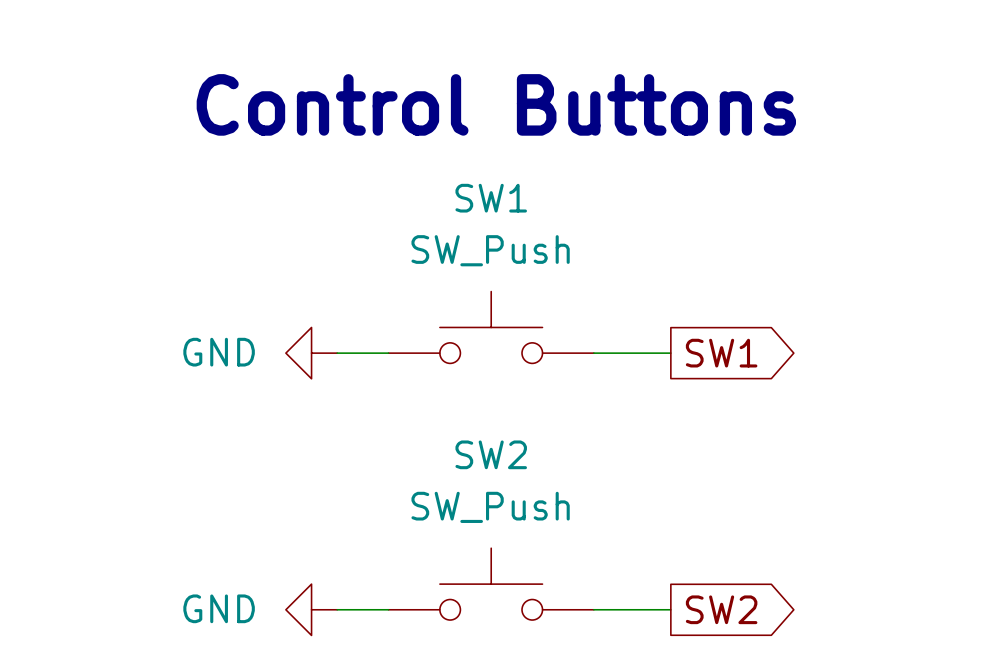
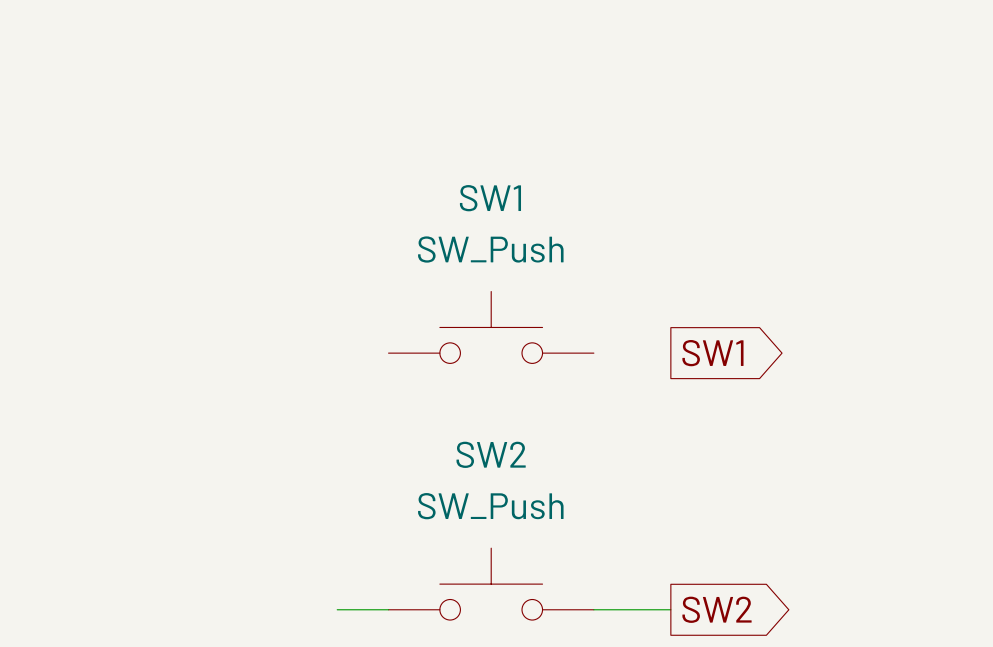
text: Control Buttons (496, 104) -> none
power symbol: GND (311, 353) -> none
wire: (337, 353) (388, 353) -> none
wire: (593, 353) (670, 353) -> none
power symbol: GND (311, 609) -> none

